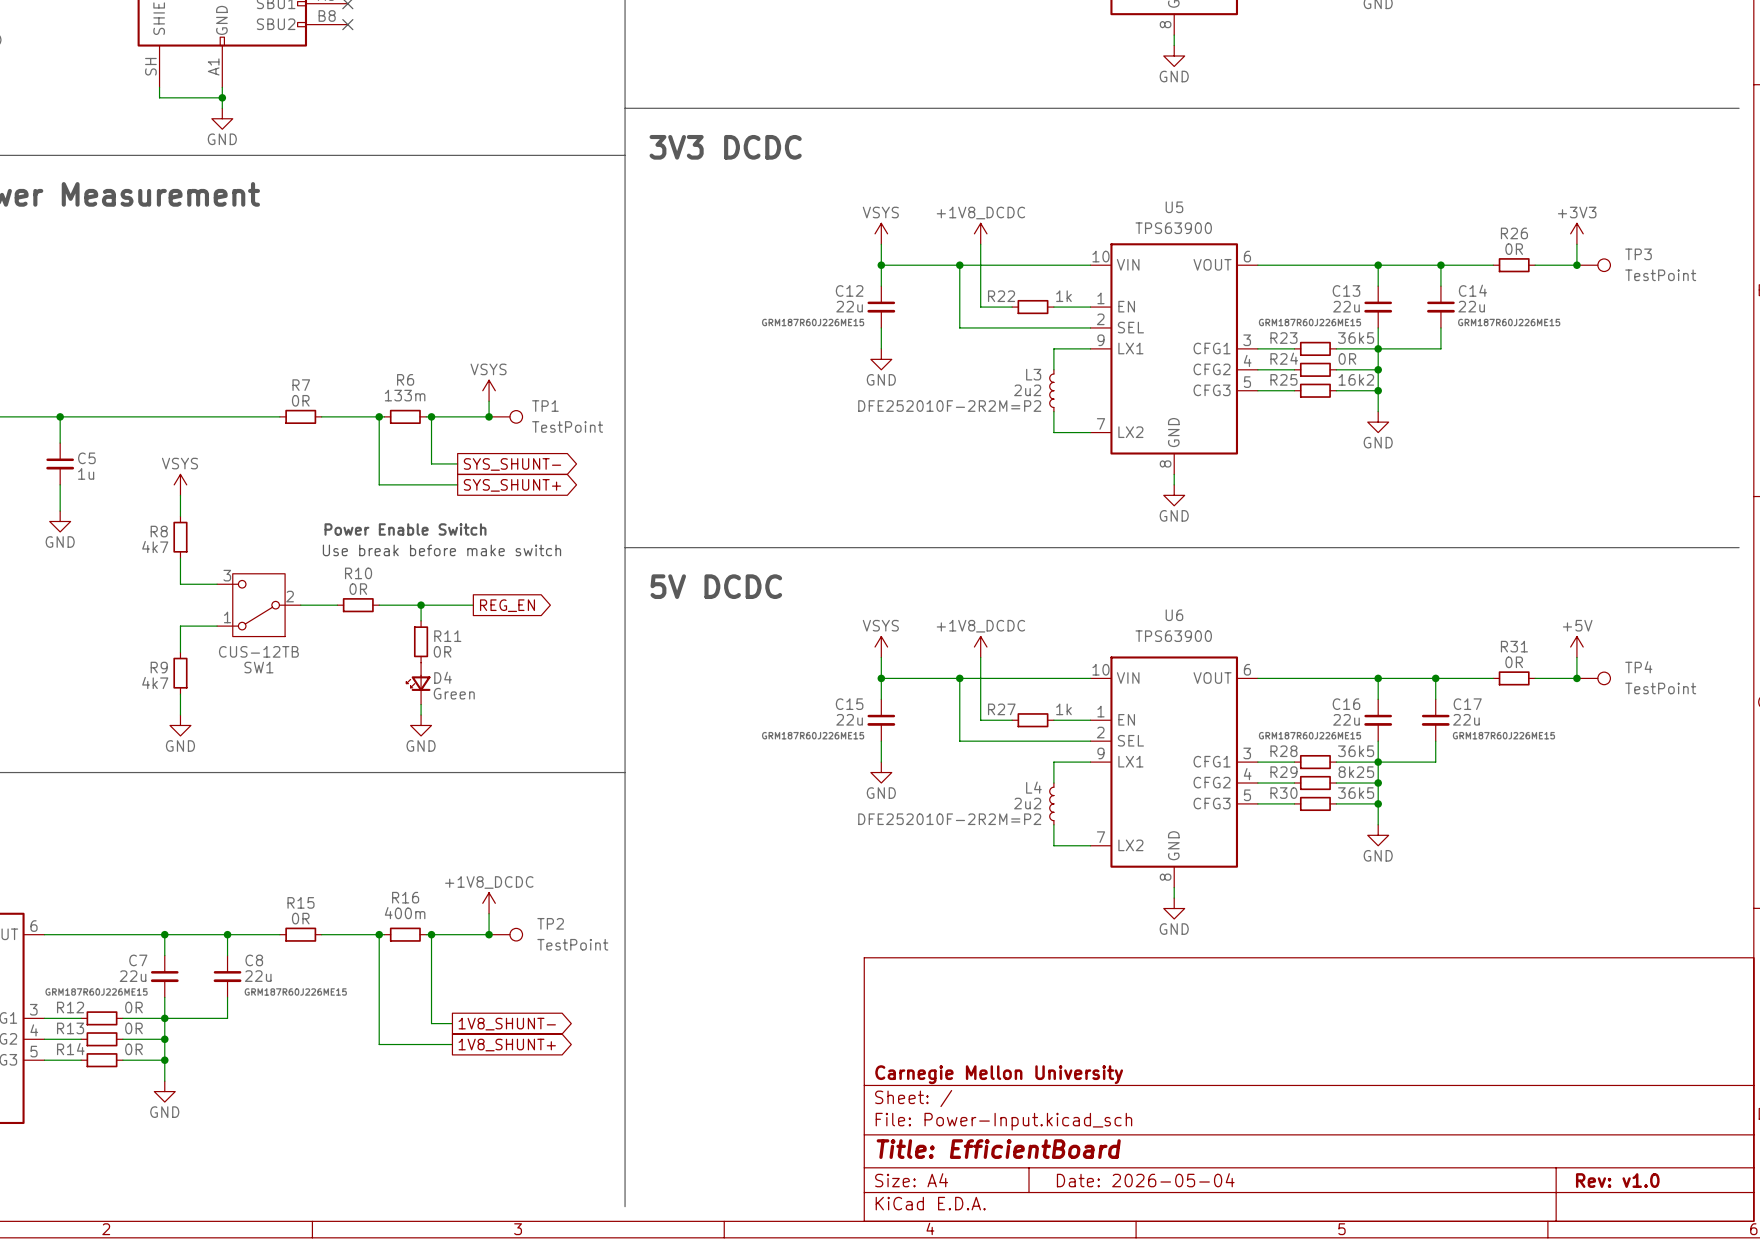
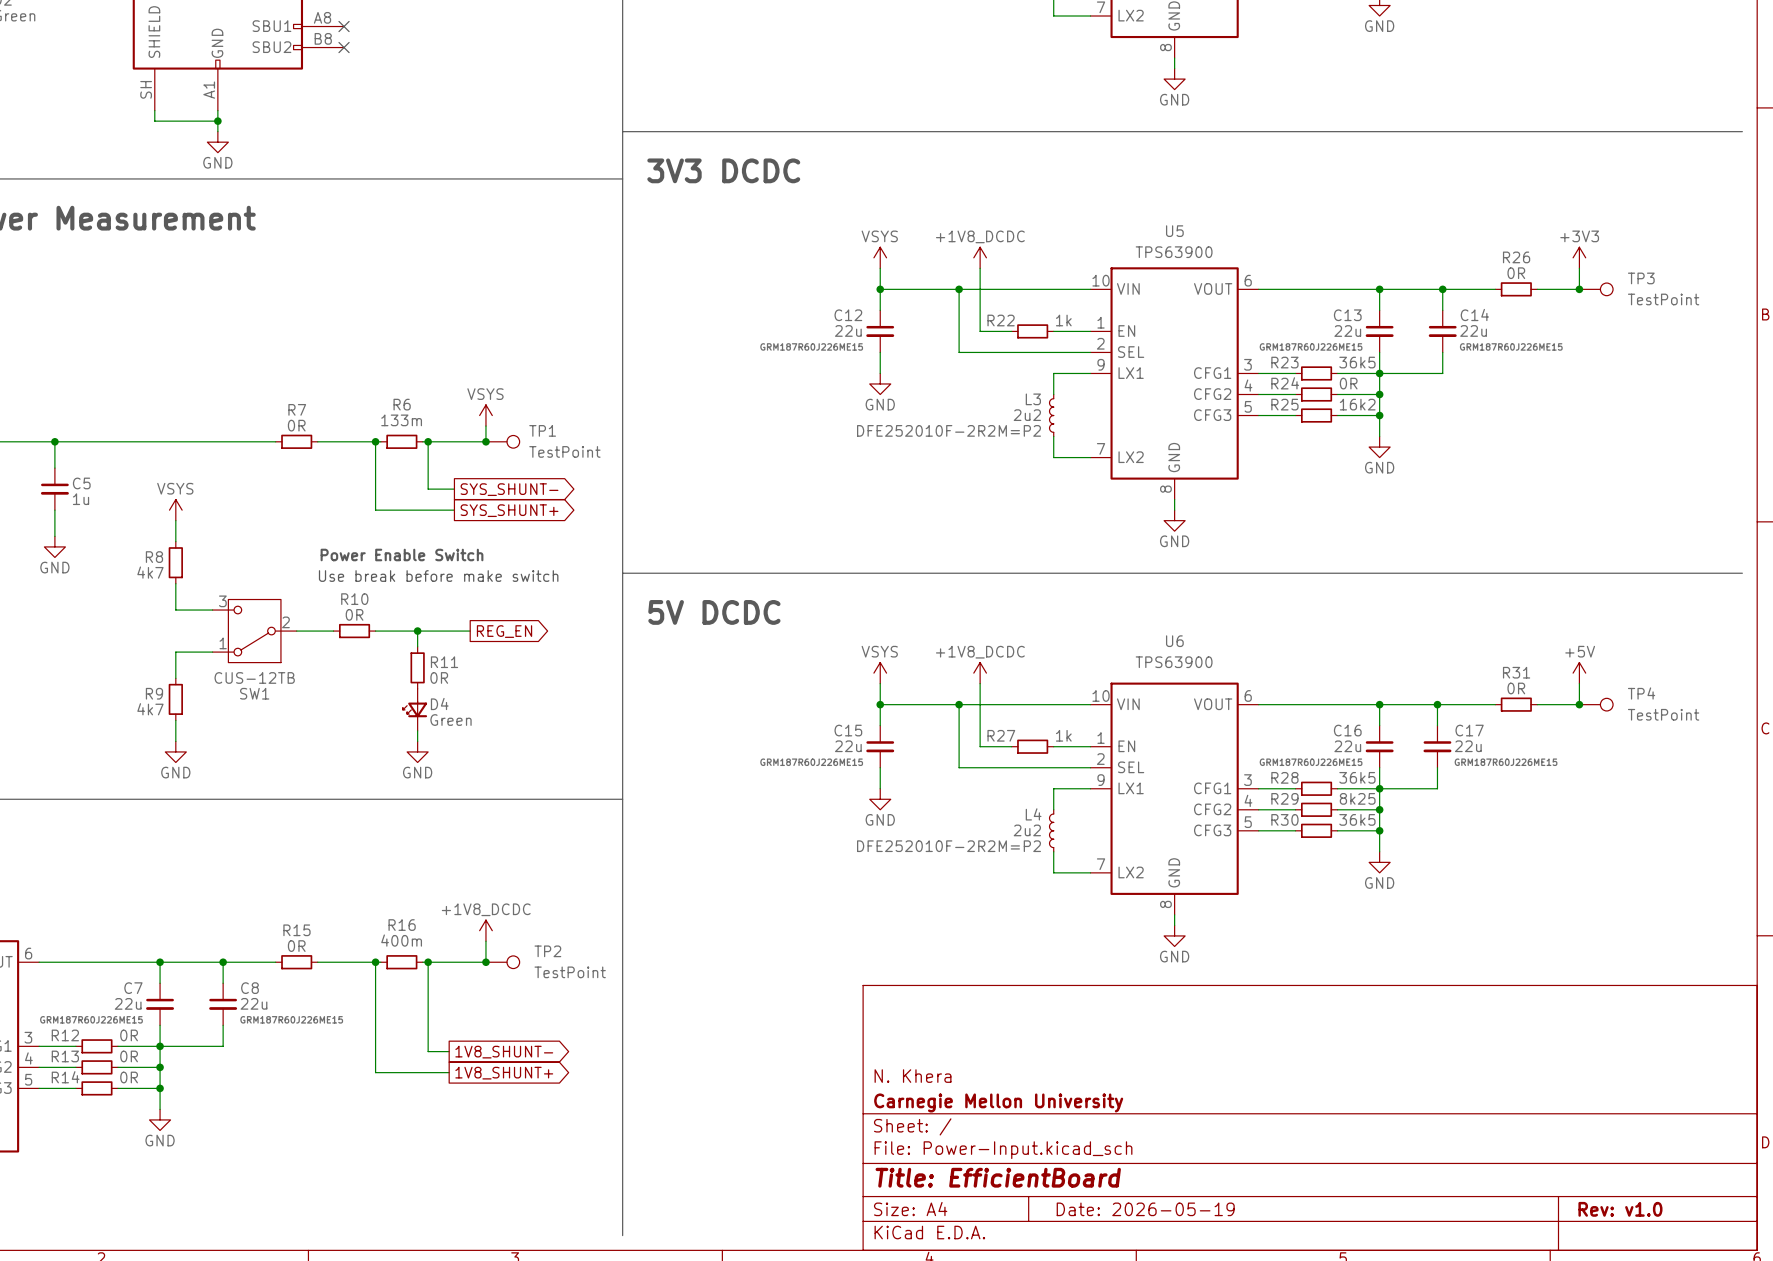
title block: none -> N. Khera (913, 1076)
title block: Date: 2026-05-04 (1145, 1180) -> Date: 2026-05-19 (1145, 1209)

